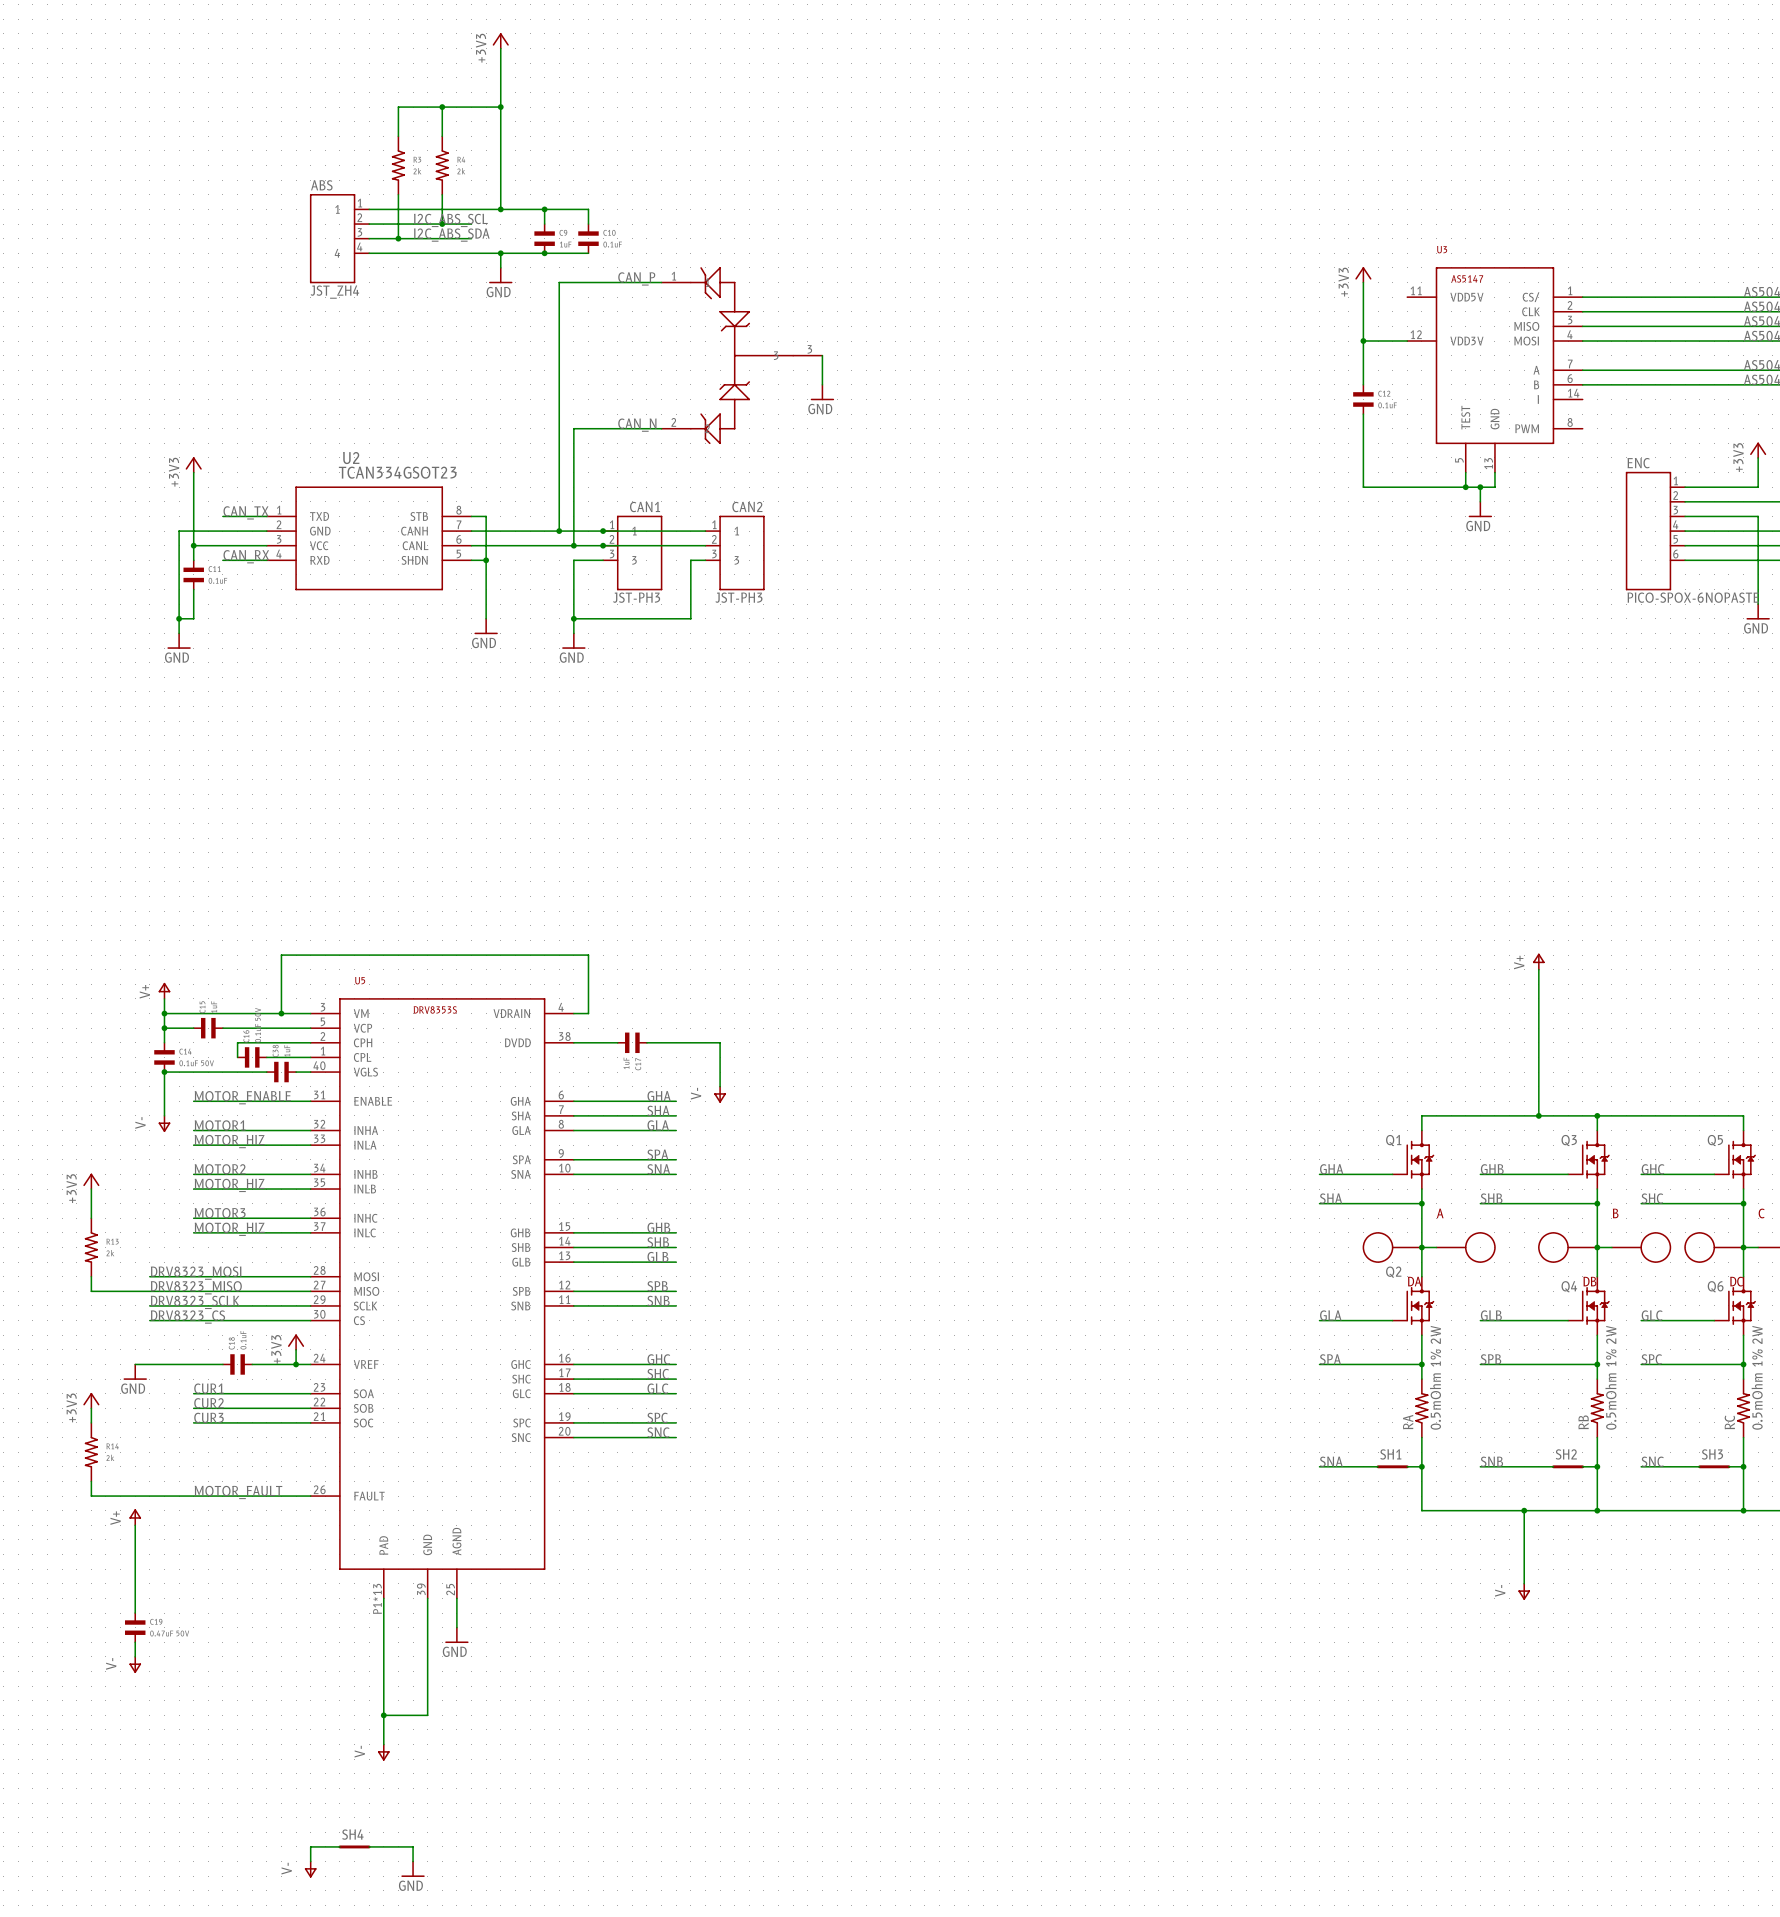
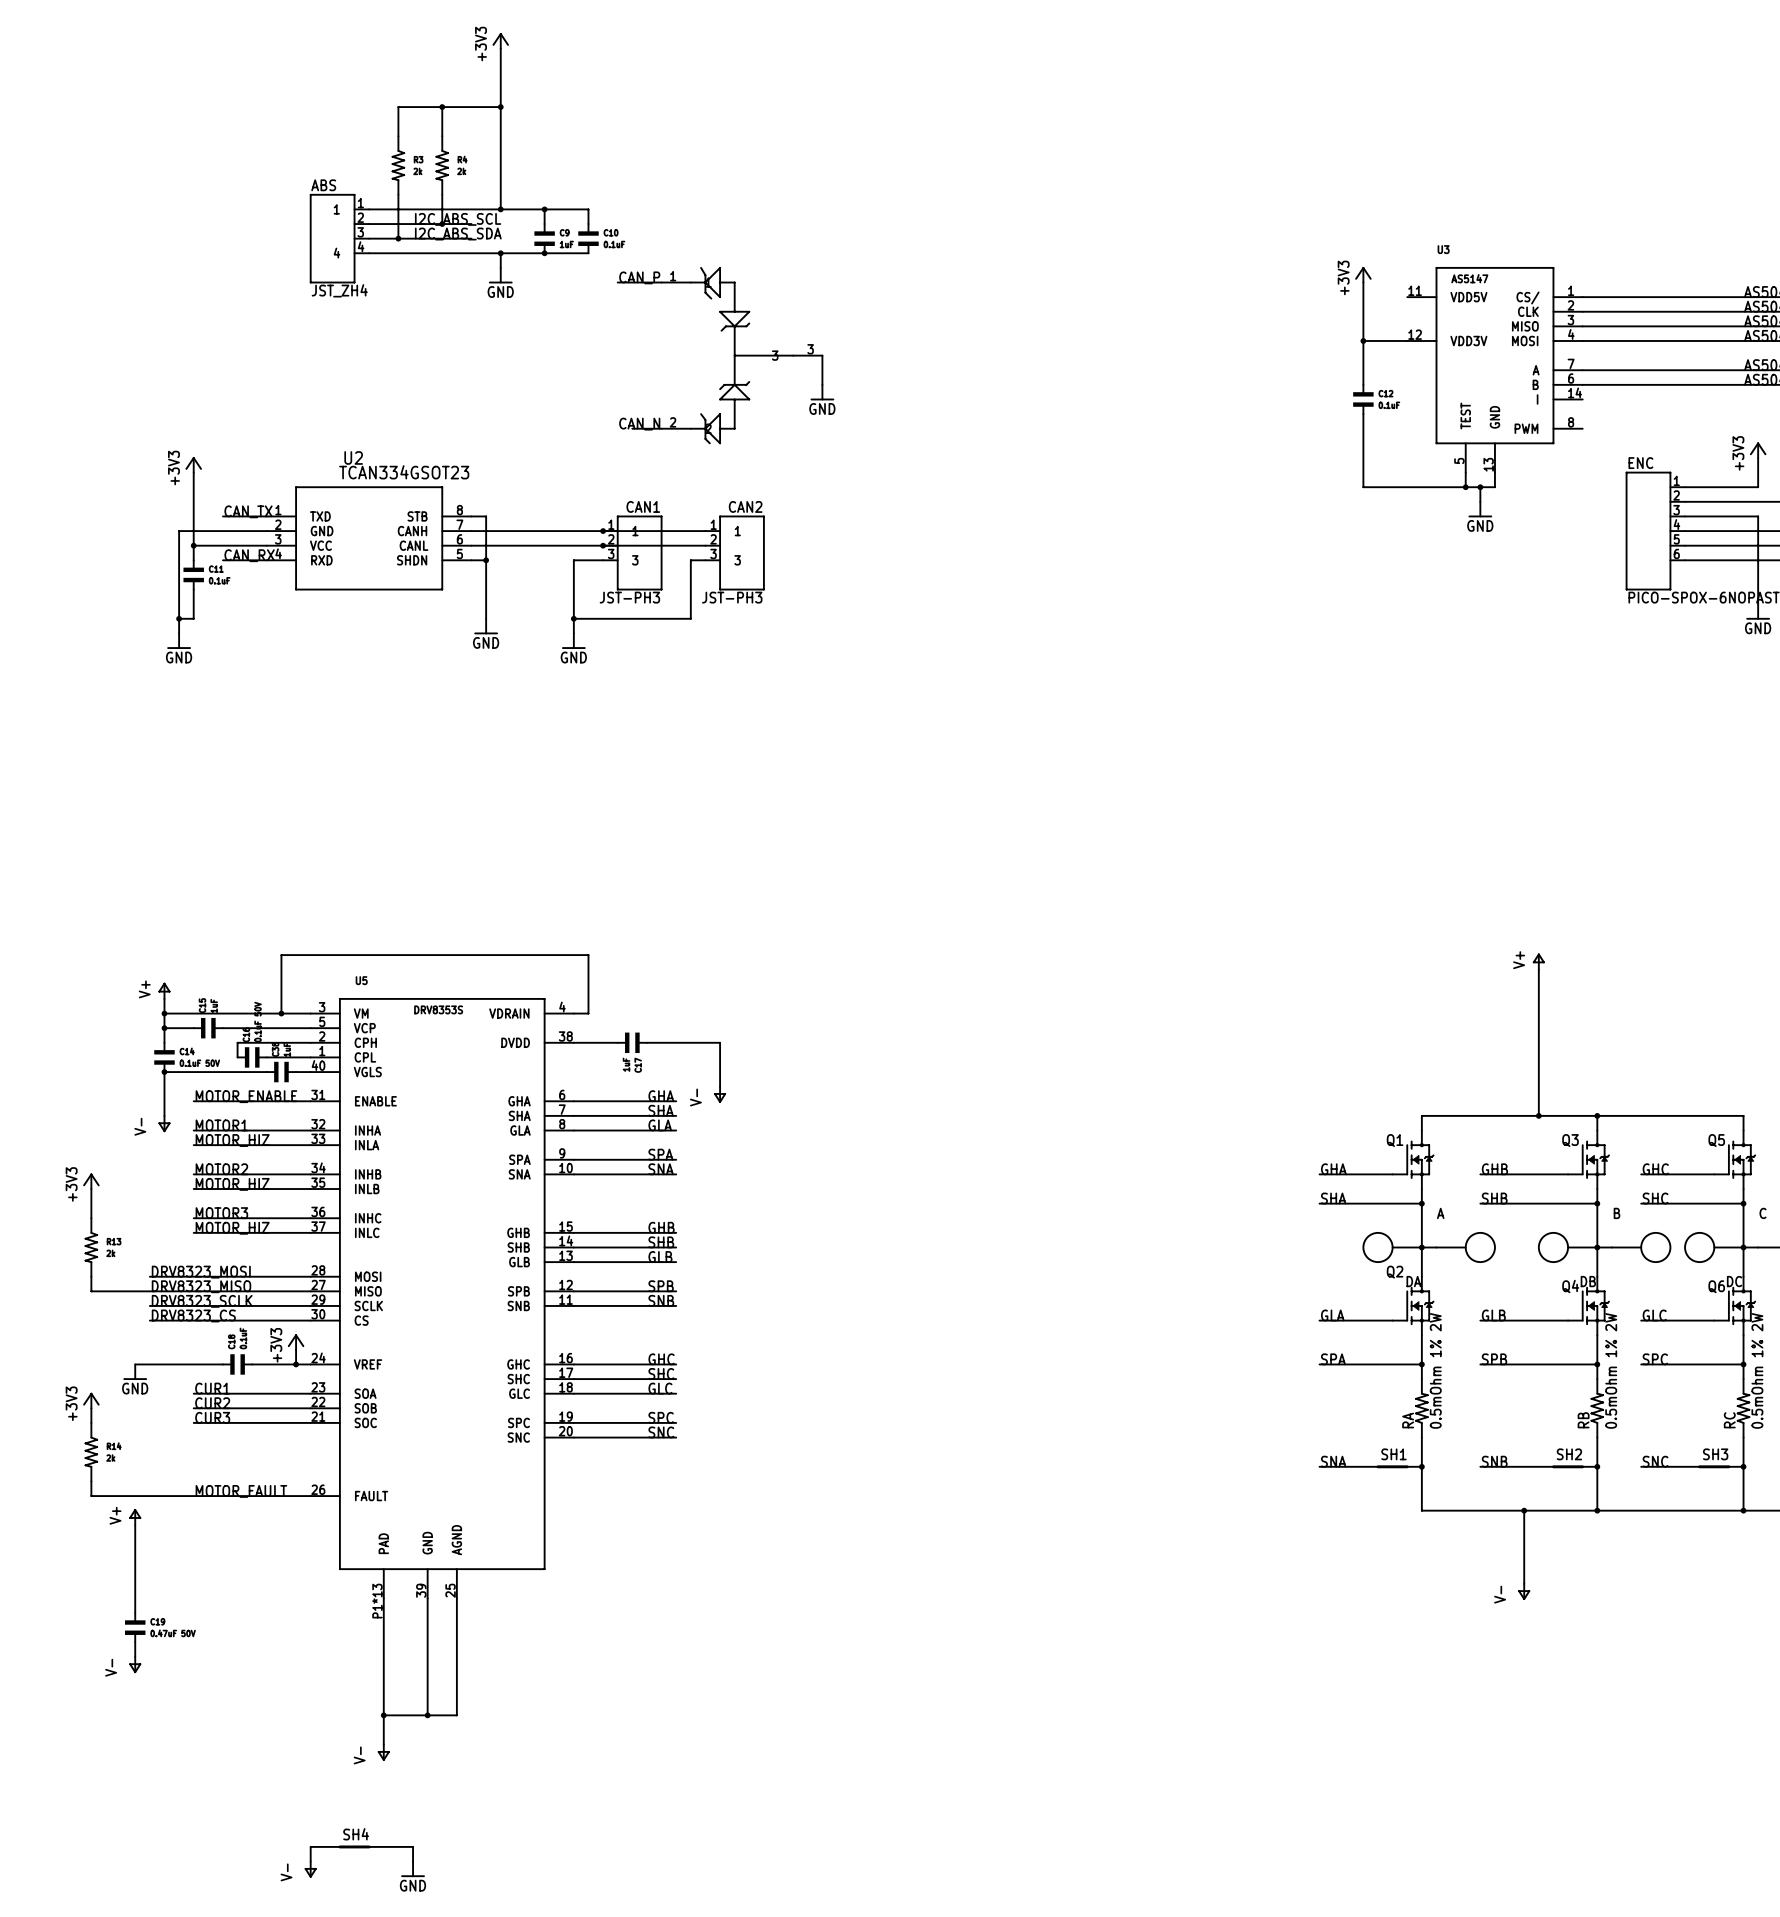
wire: (617, 282) (559, 282) (559, 531) -> none
wire: (632, 428) (573, 428) (573, 545) -> none
junction: (559, 531) -> none
junction: (573, 545) -> none
wire: none -> (456, 1627) (456, 1715) (427, 1715)
power symbol: GND (456, 1635) -> none
junction: none -> (427, 1715)

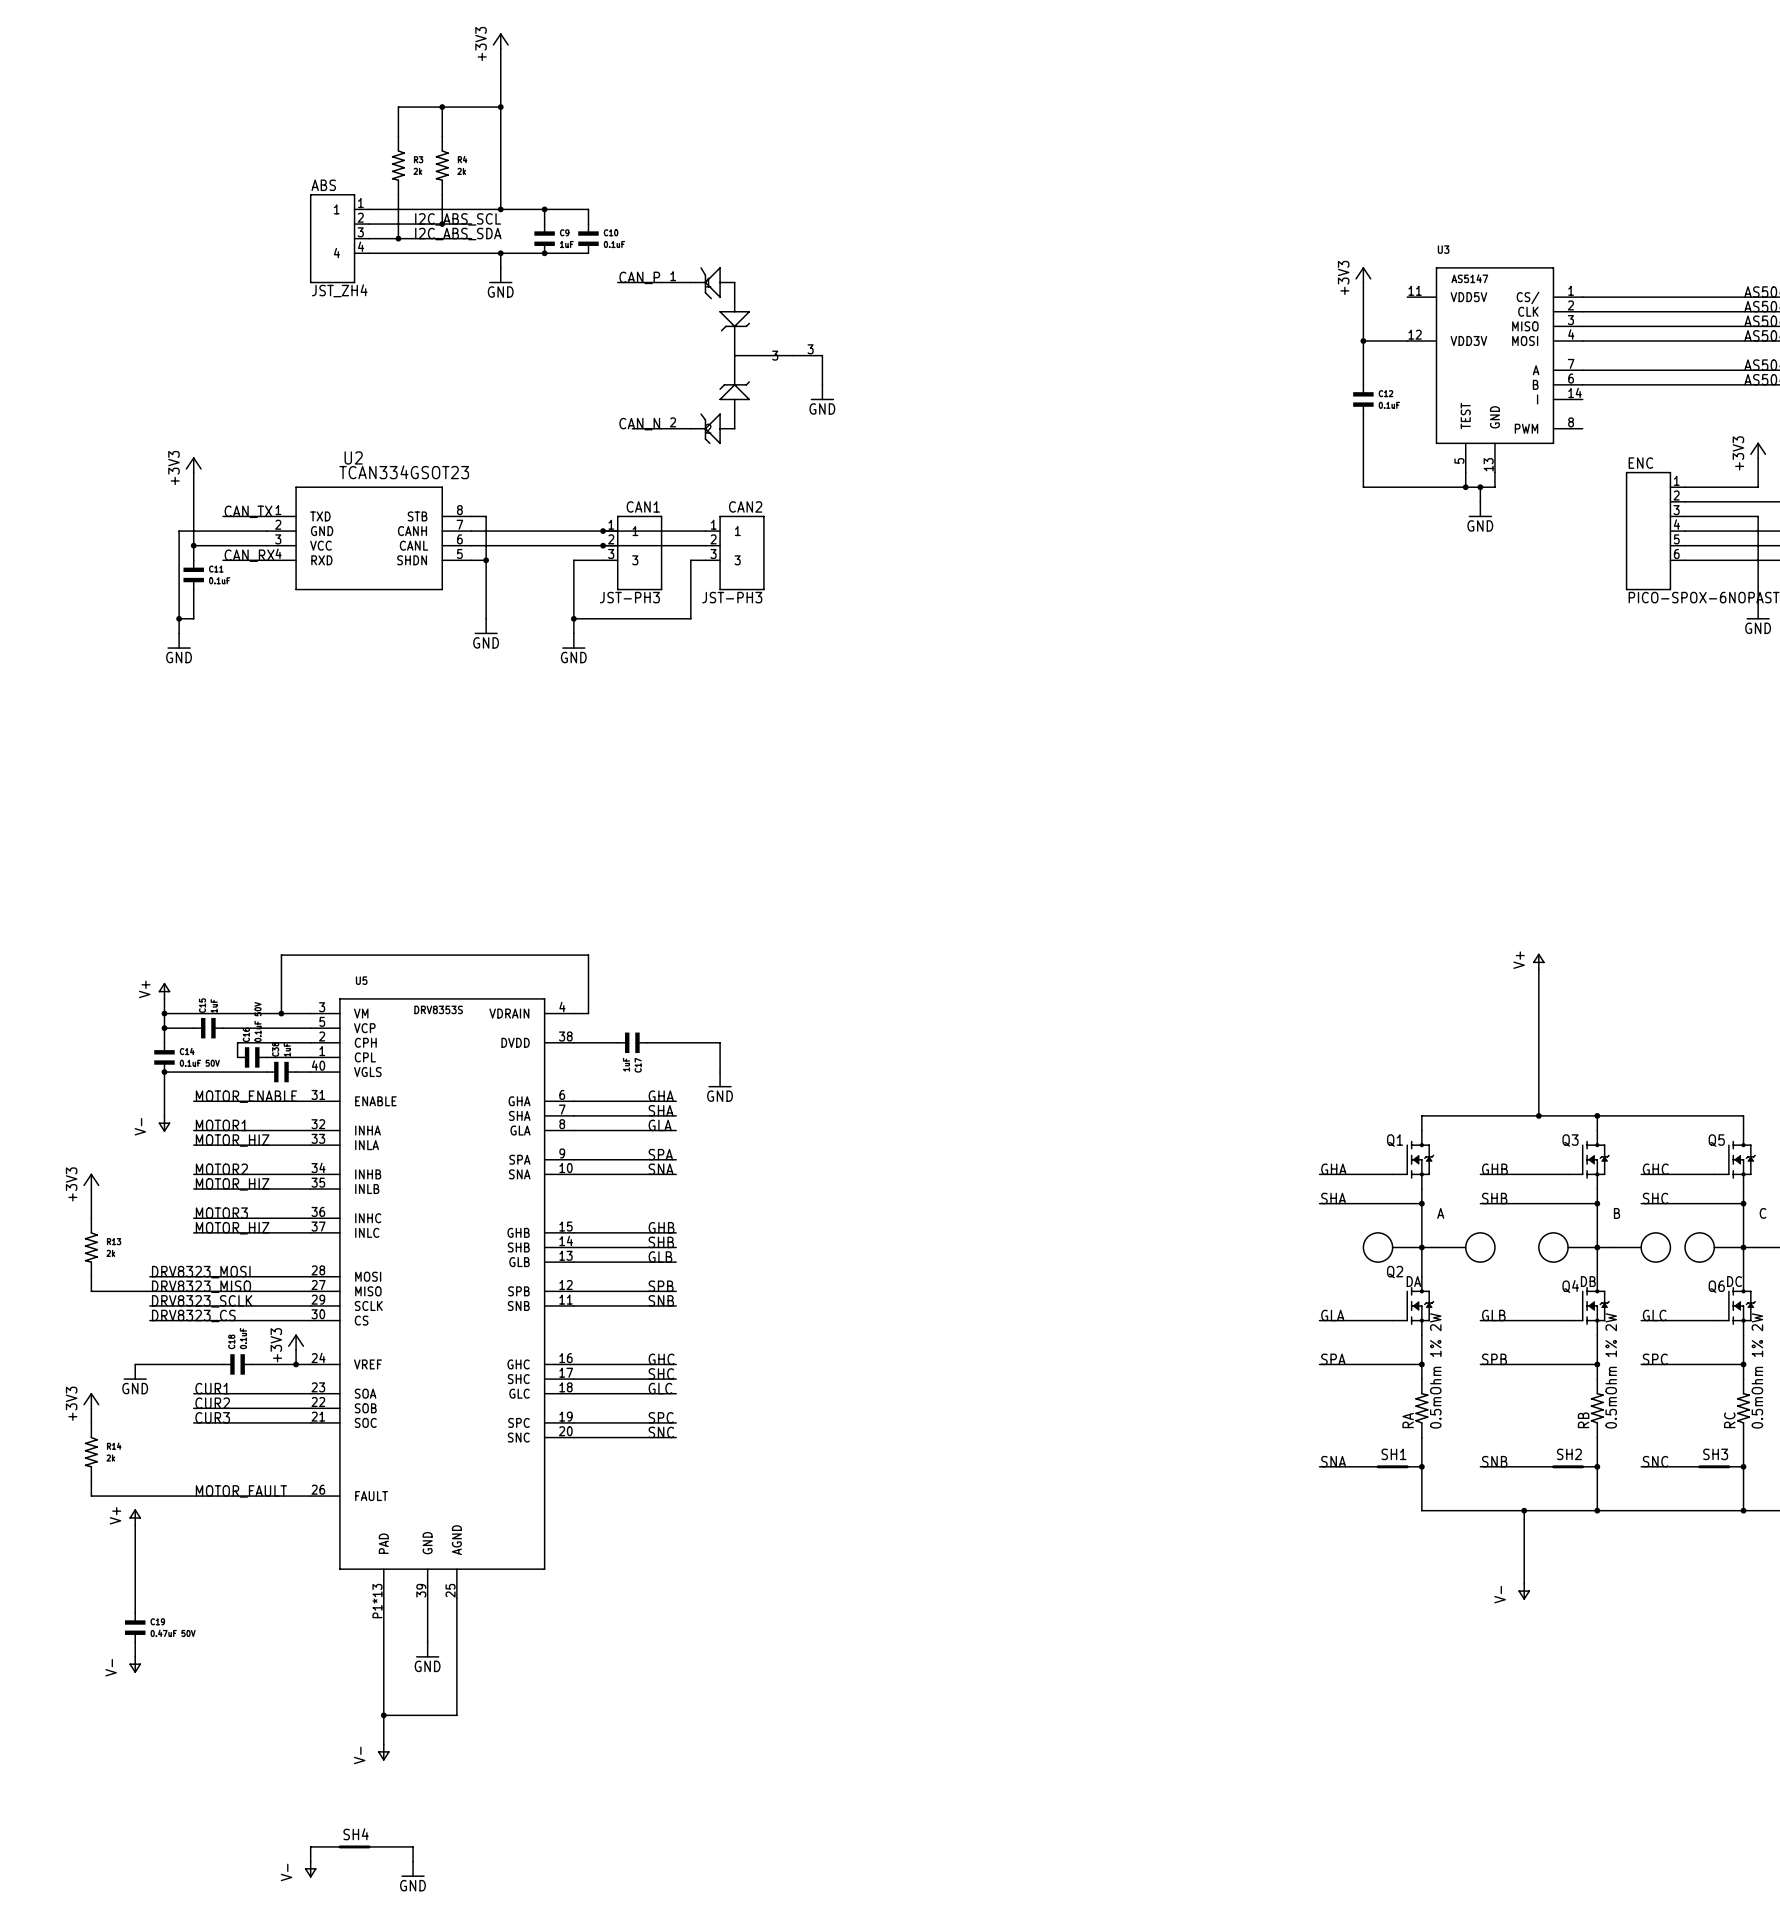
power symbol: none -> GND (720, 1079)
power symbol: V- (720, 1094) -> none
wire: (427, 1642) (427, 1715) -> none
power symbol: none -> GND (427, 1649)
junction: (427, 1715) -> none

